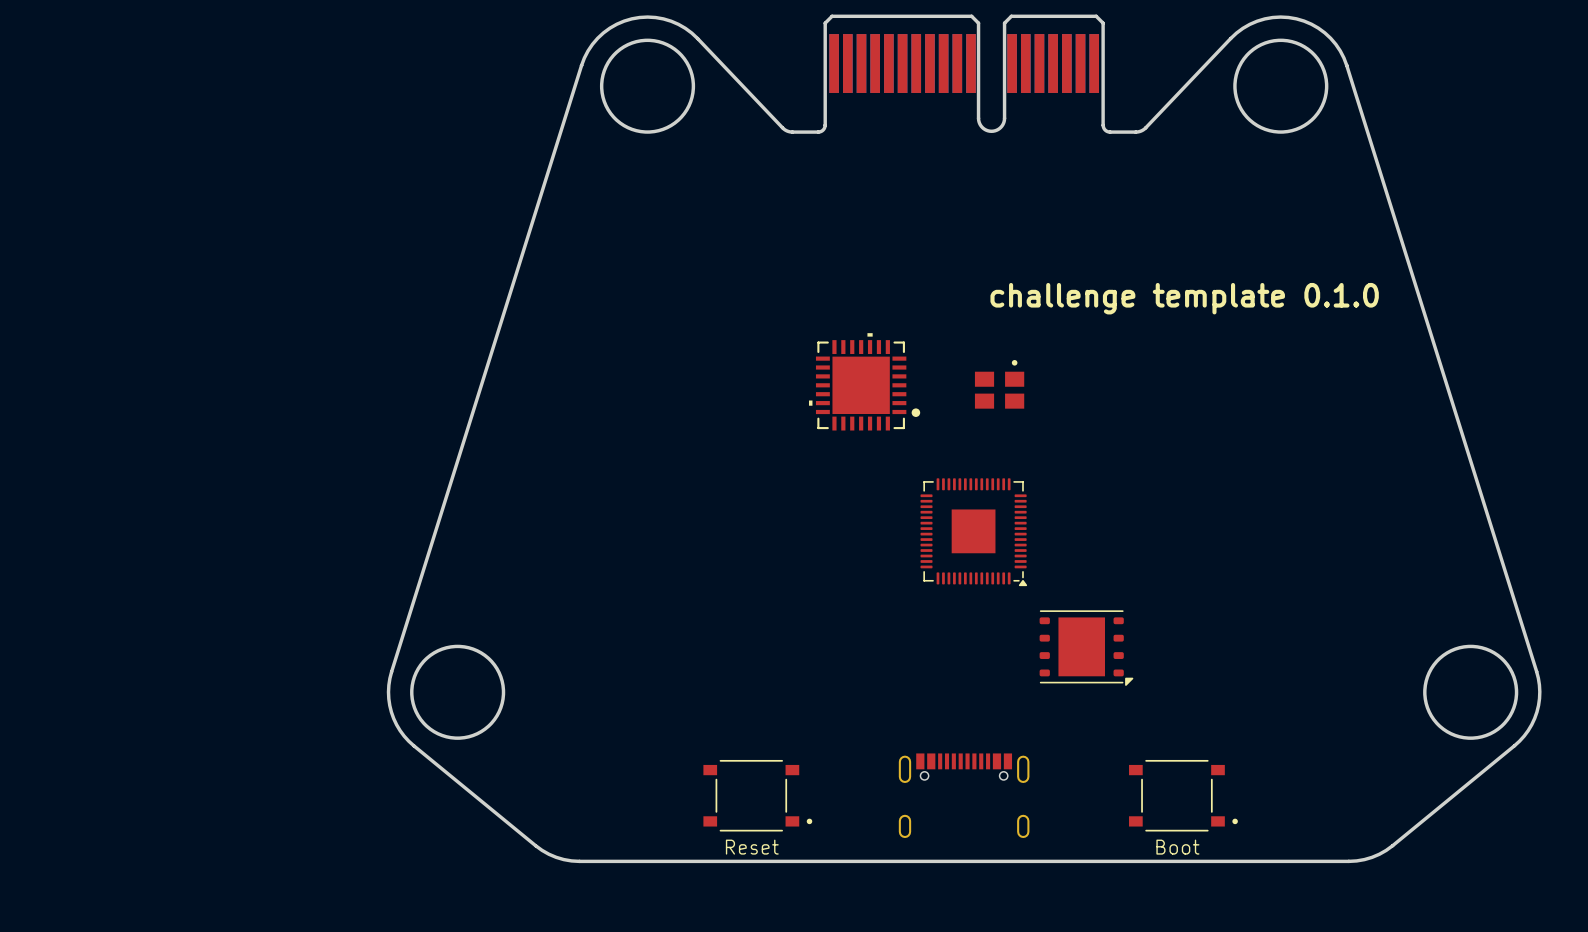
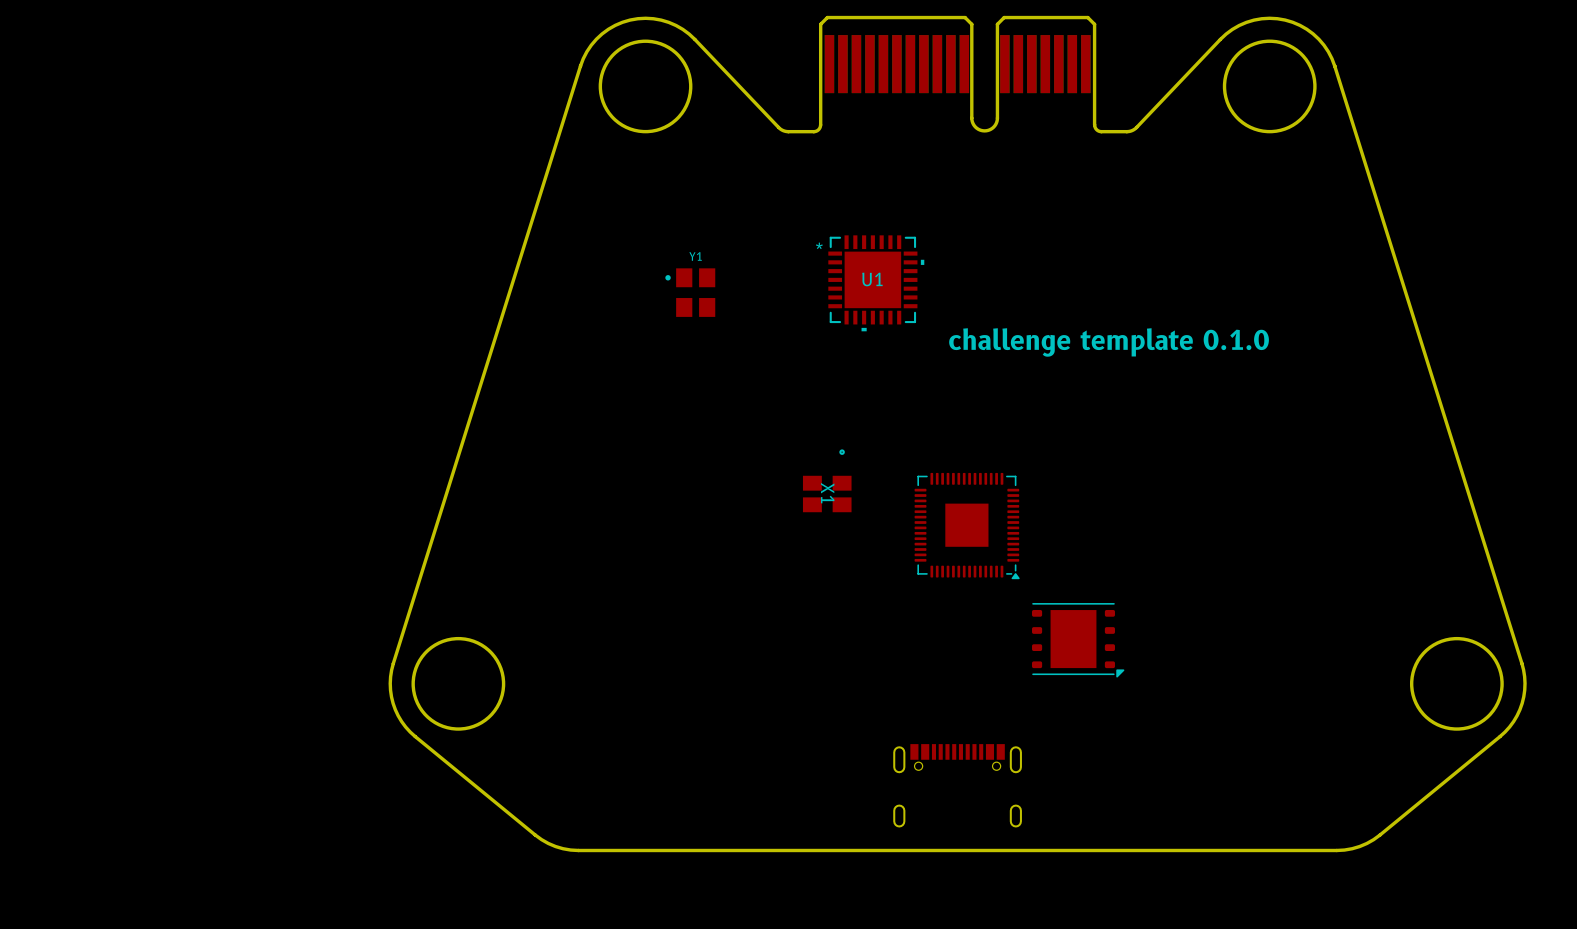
U1: none -> (876, 283)
Y1: none -> (690, 292)
text position: challenge template 0.1.0 (1184, 298) -> challenge template 0.1.0 (1109, 342)
part: (864, 381) -> none
part: (999, 384) -> none
X1: none -> (827, 480)
part: (757, 795) -> none
part: (1183, 795) -> none
text: Reset (752, 847) -> none
text: Boot (1177, 847) -> none

